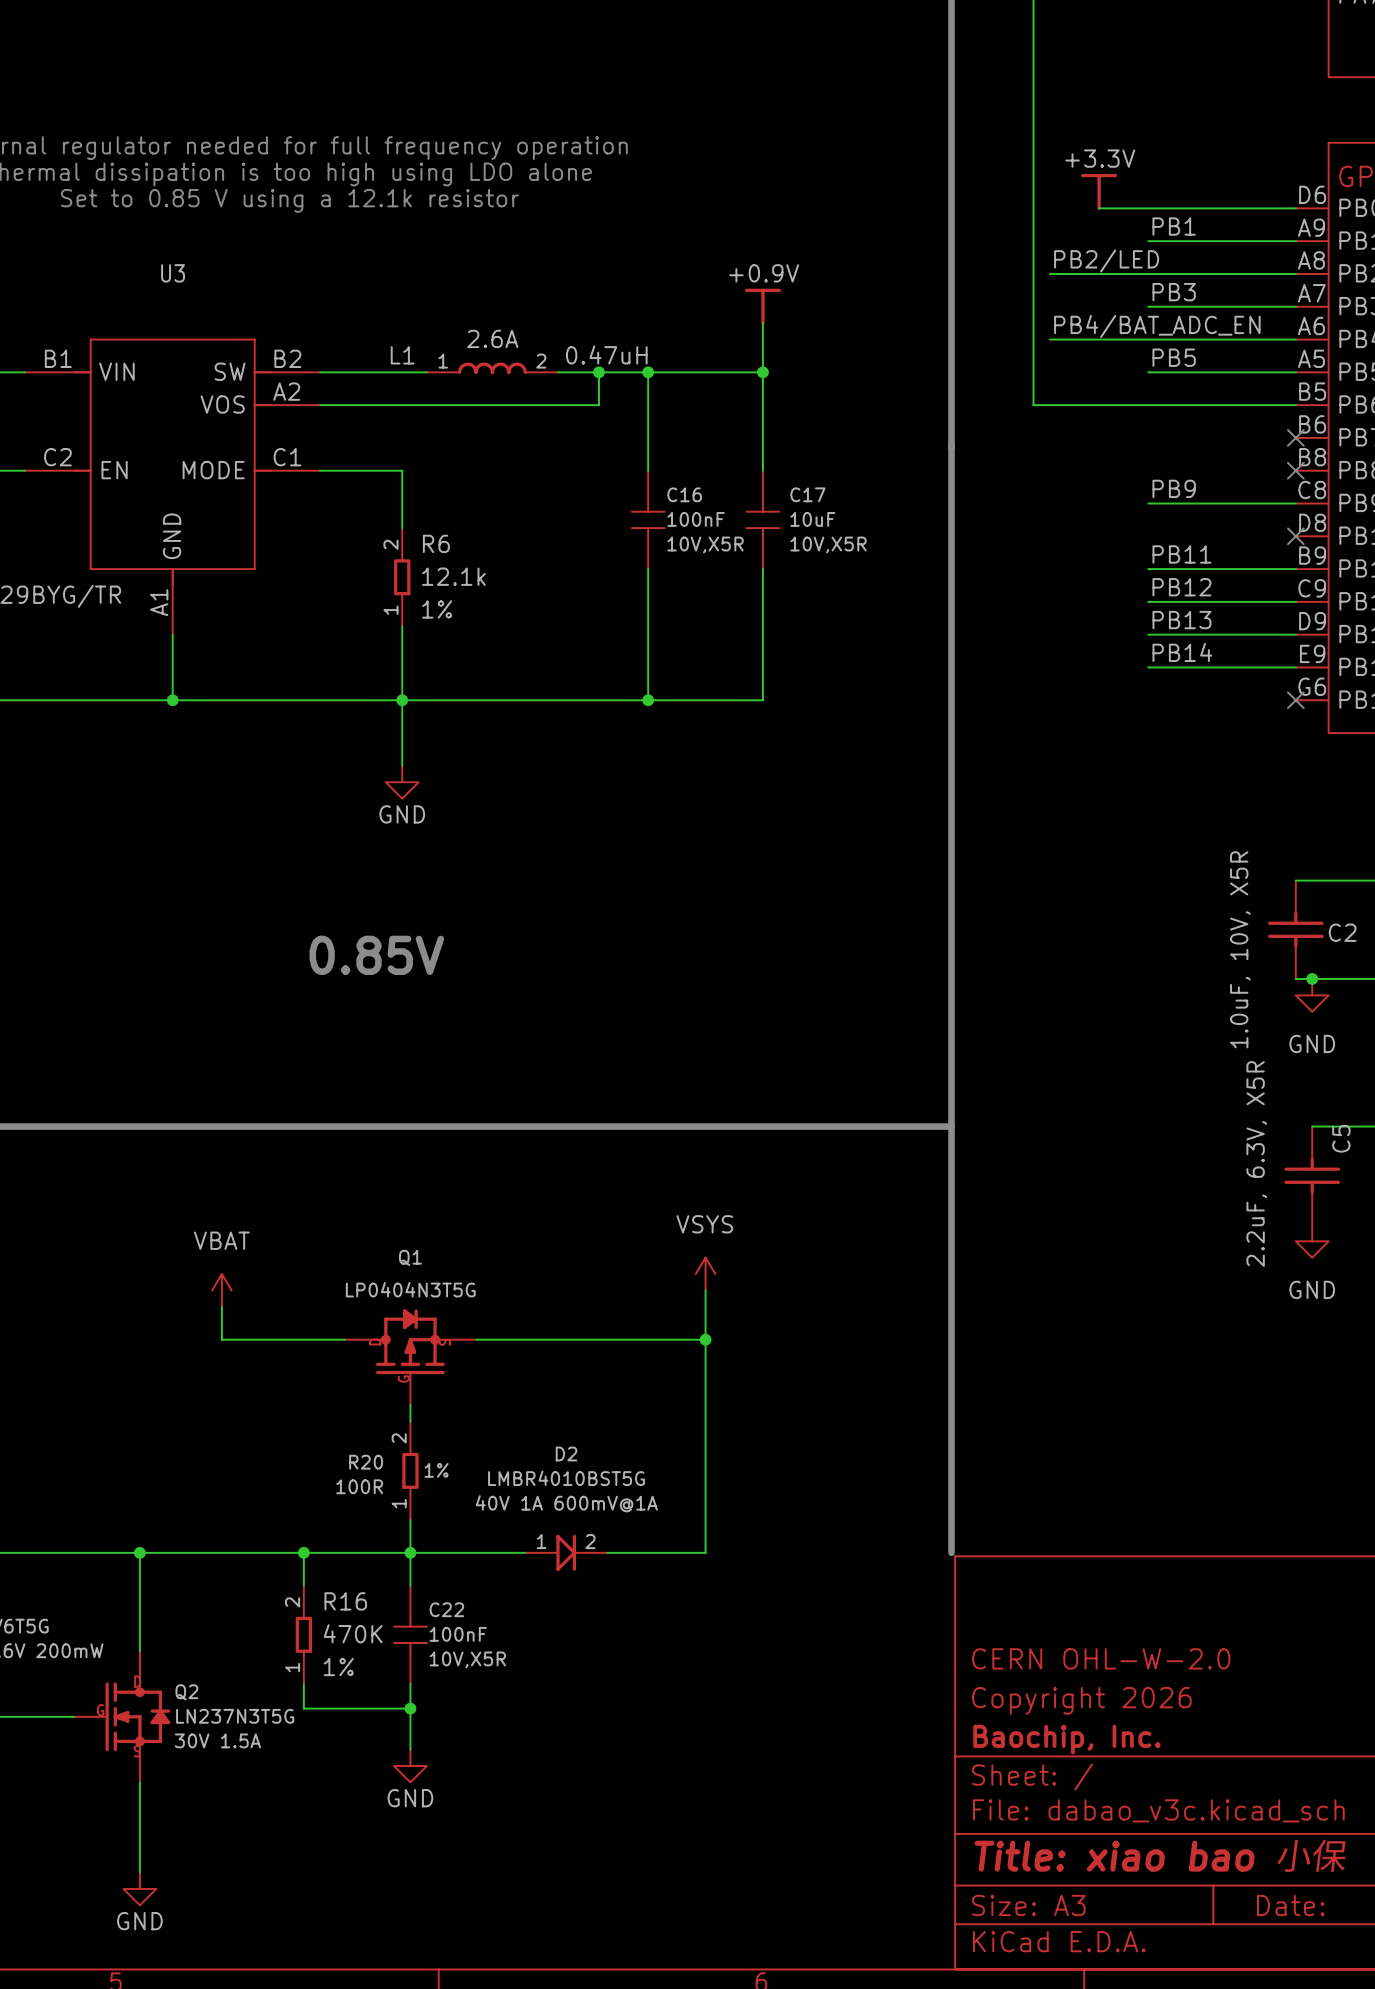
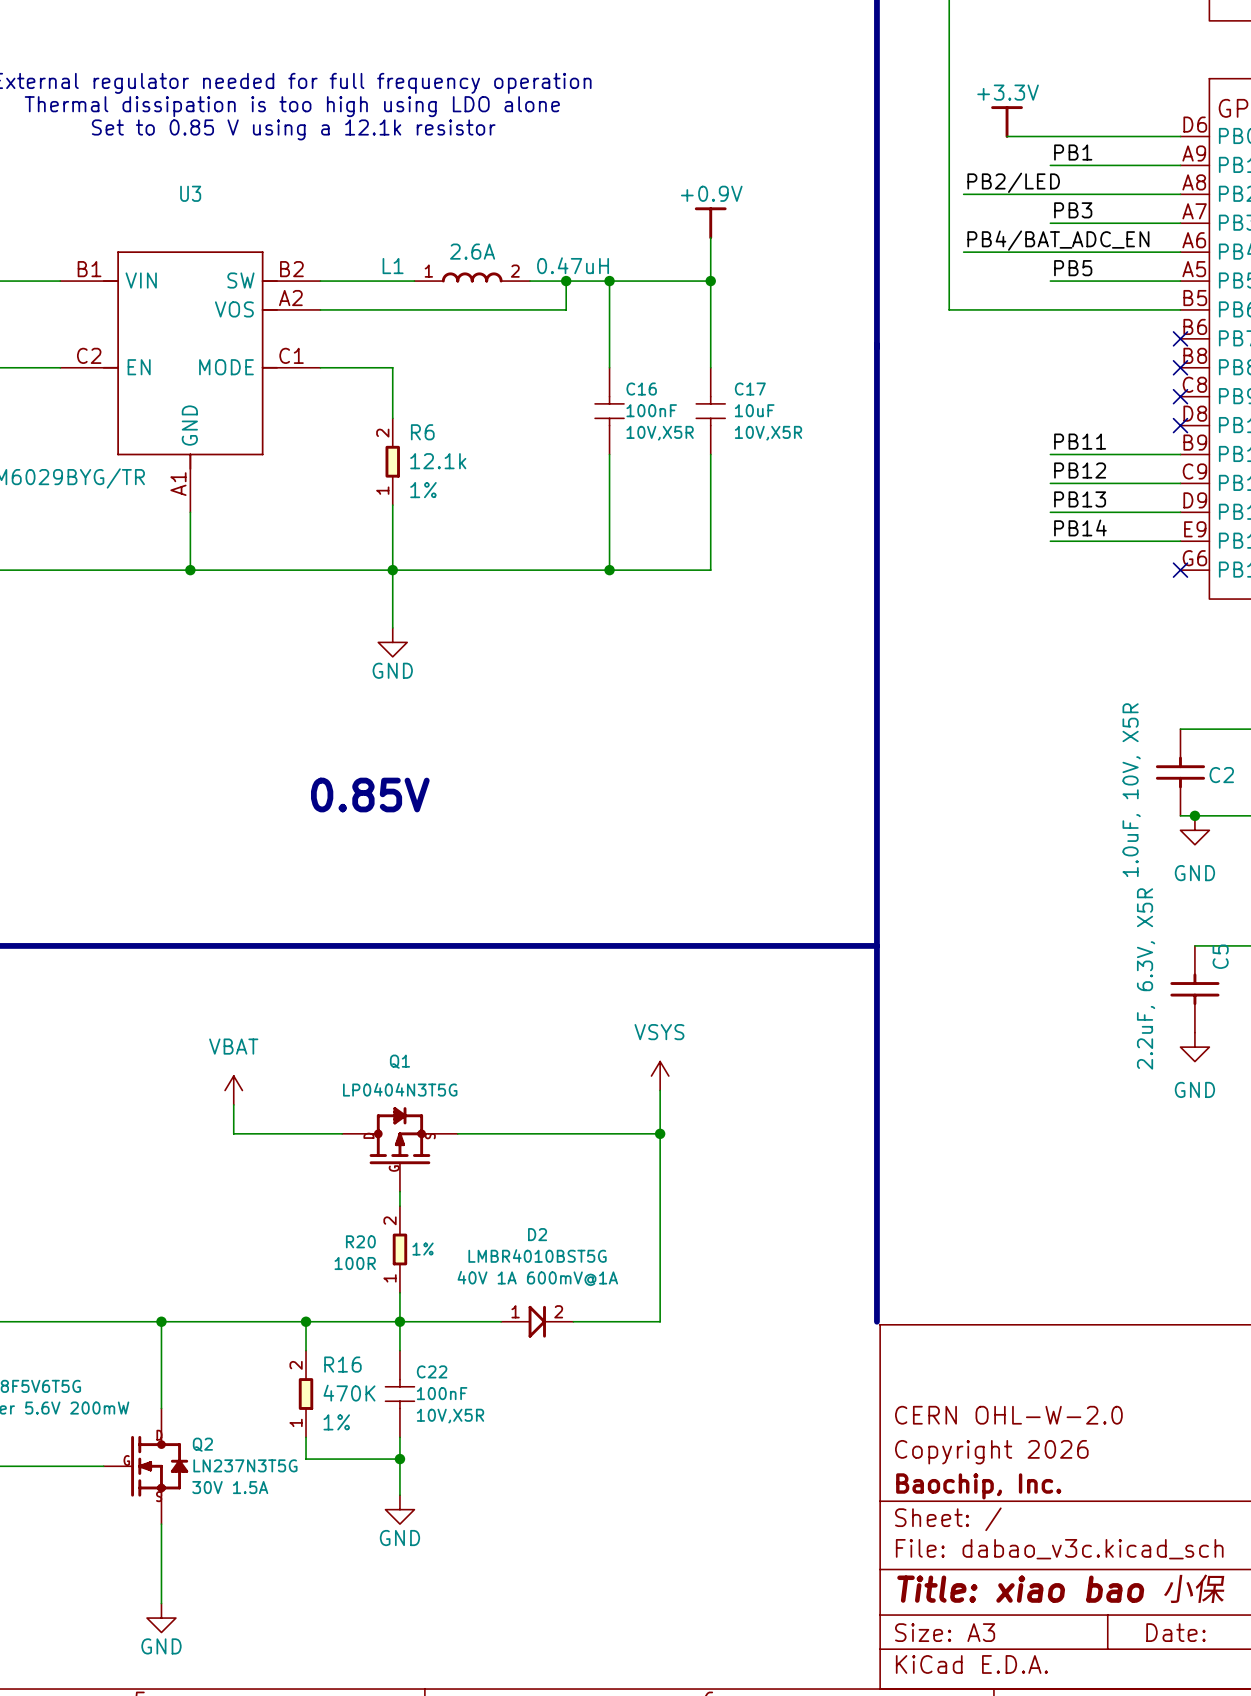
label: PB9 (1174, 488) -> none
wire: (1148, 503) (1295, 503) -> none
no-connect mark: none -> (1180, 396)

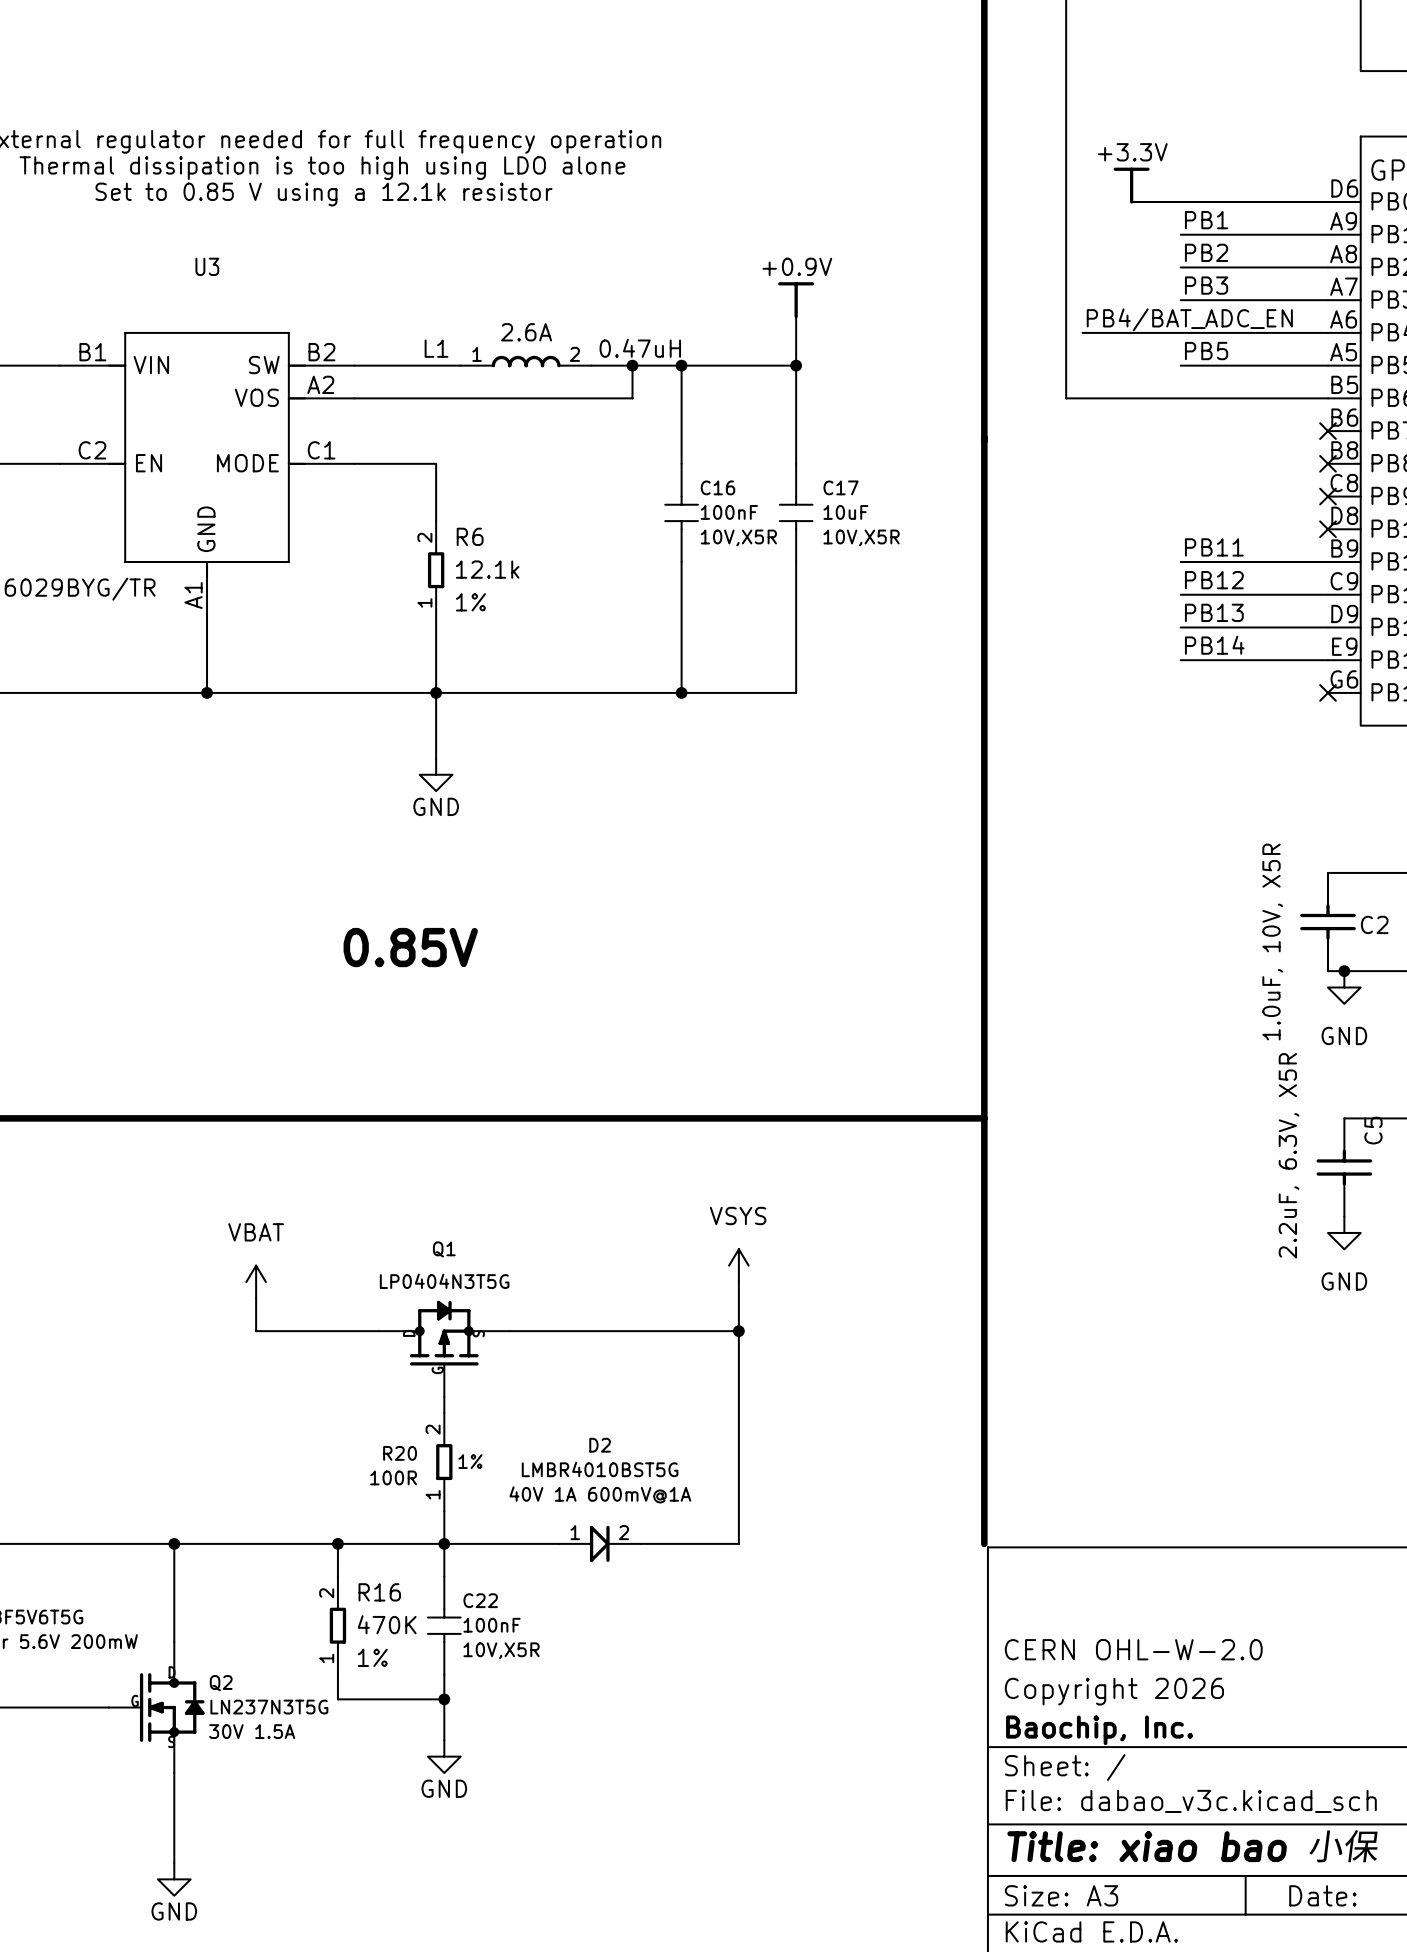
label: none -> PB2 (1206, 252)
label: PB2/LED (1013, 182) -> none
wire: (963, 194) (1050, 194) -> none

